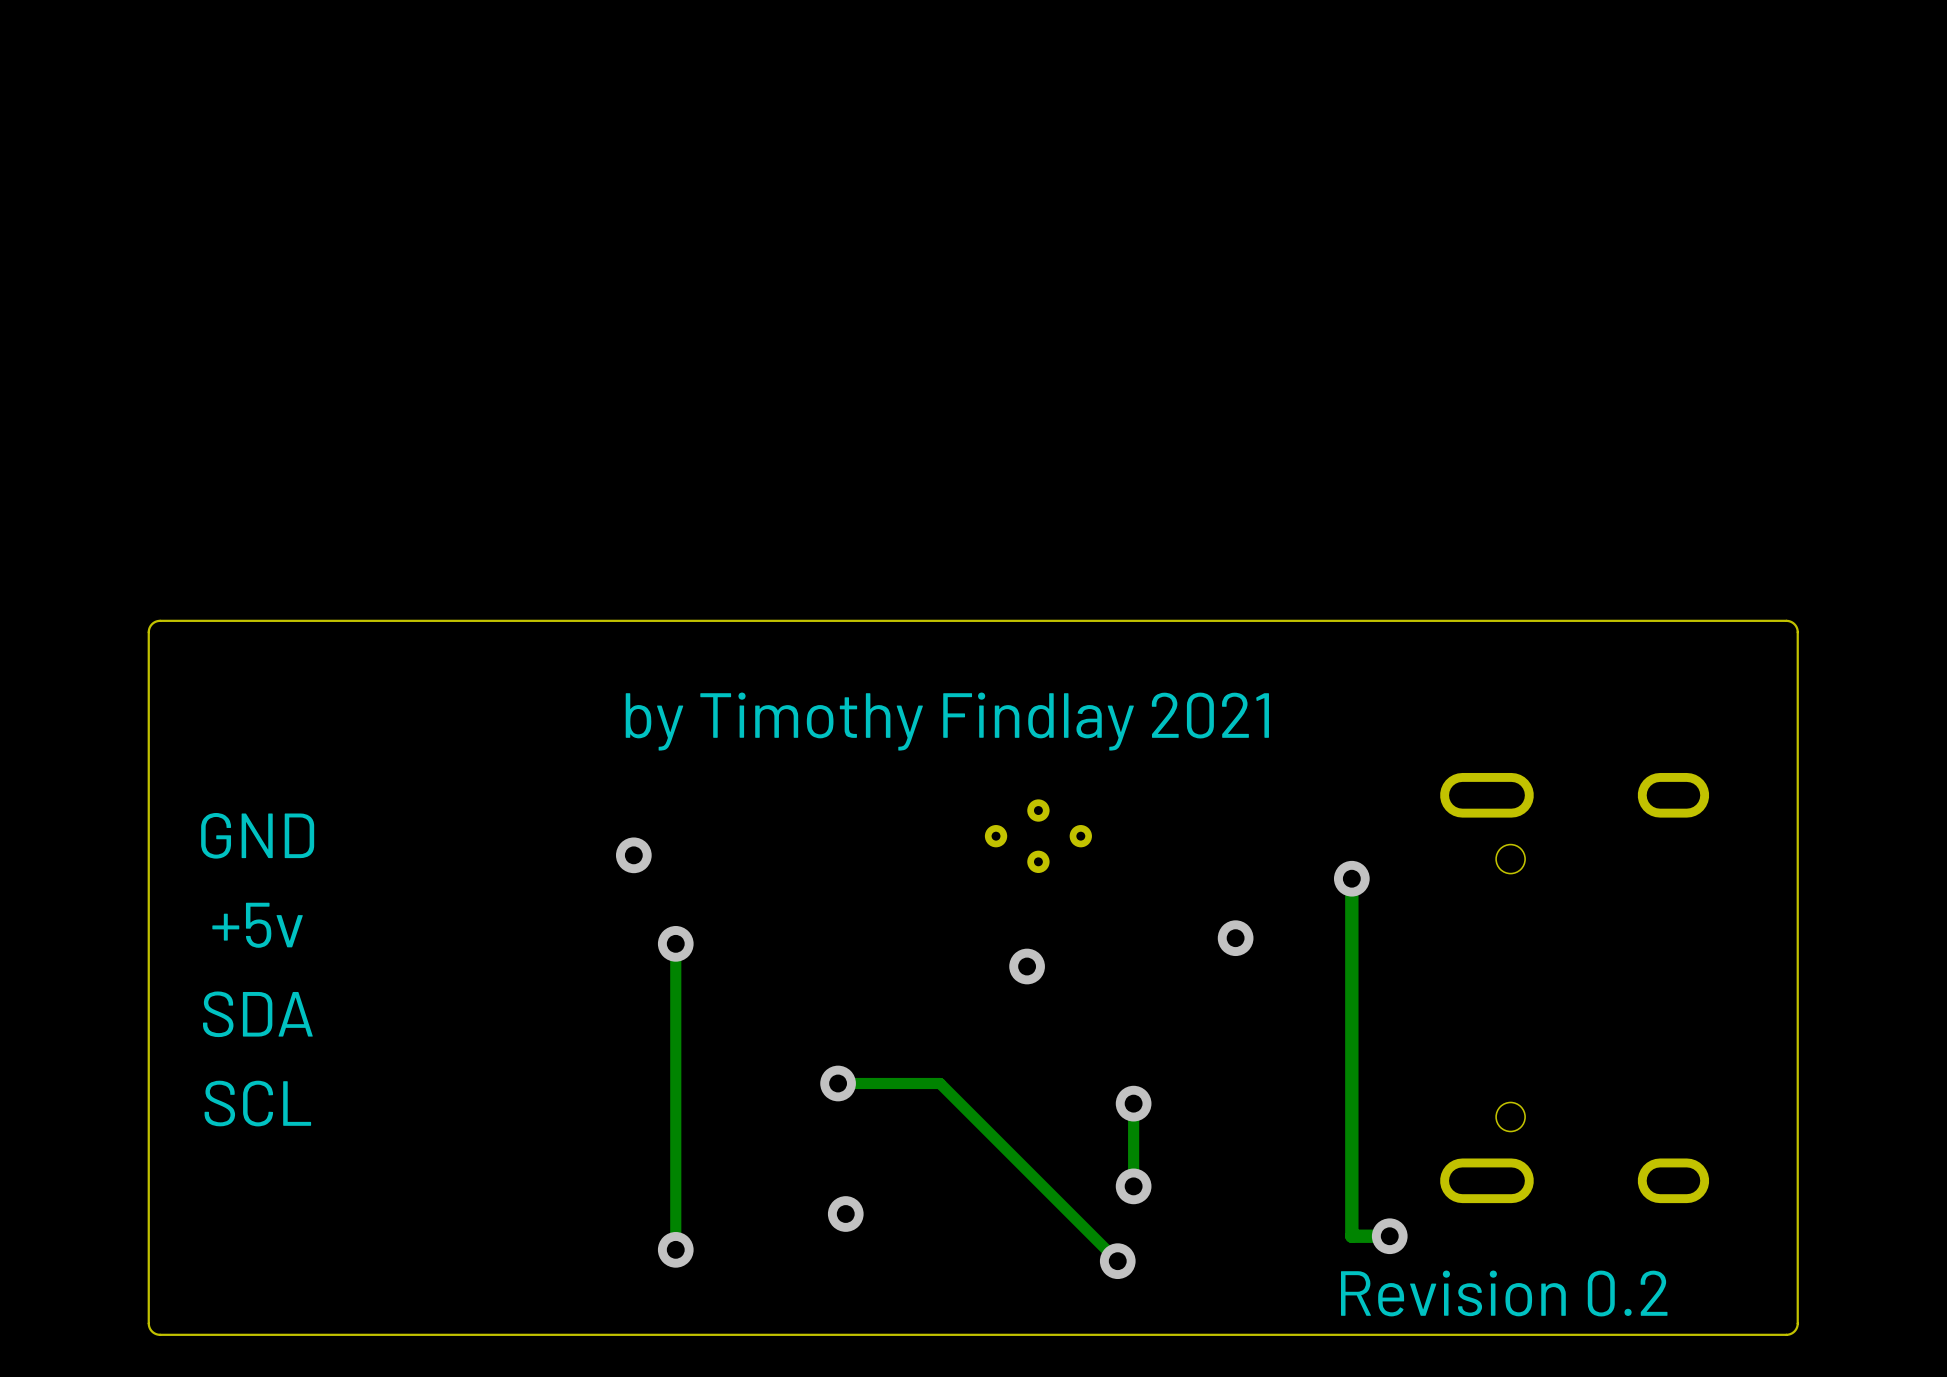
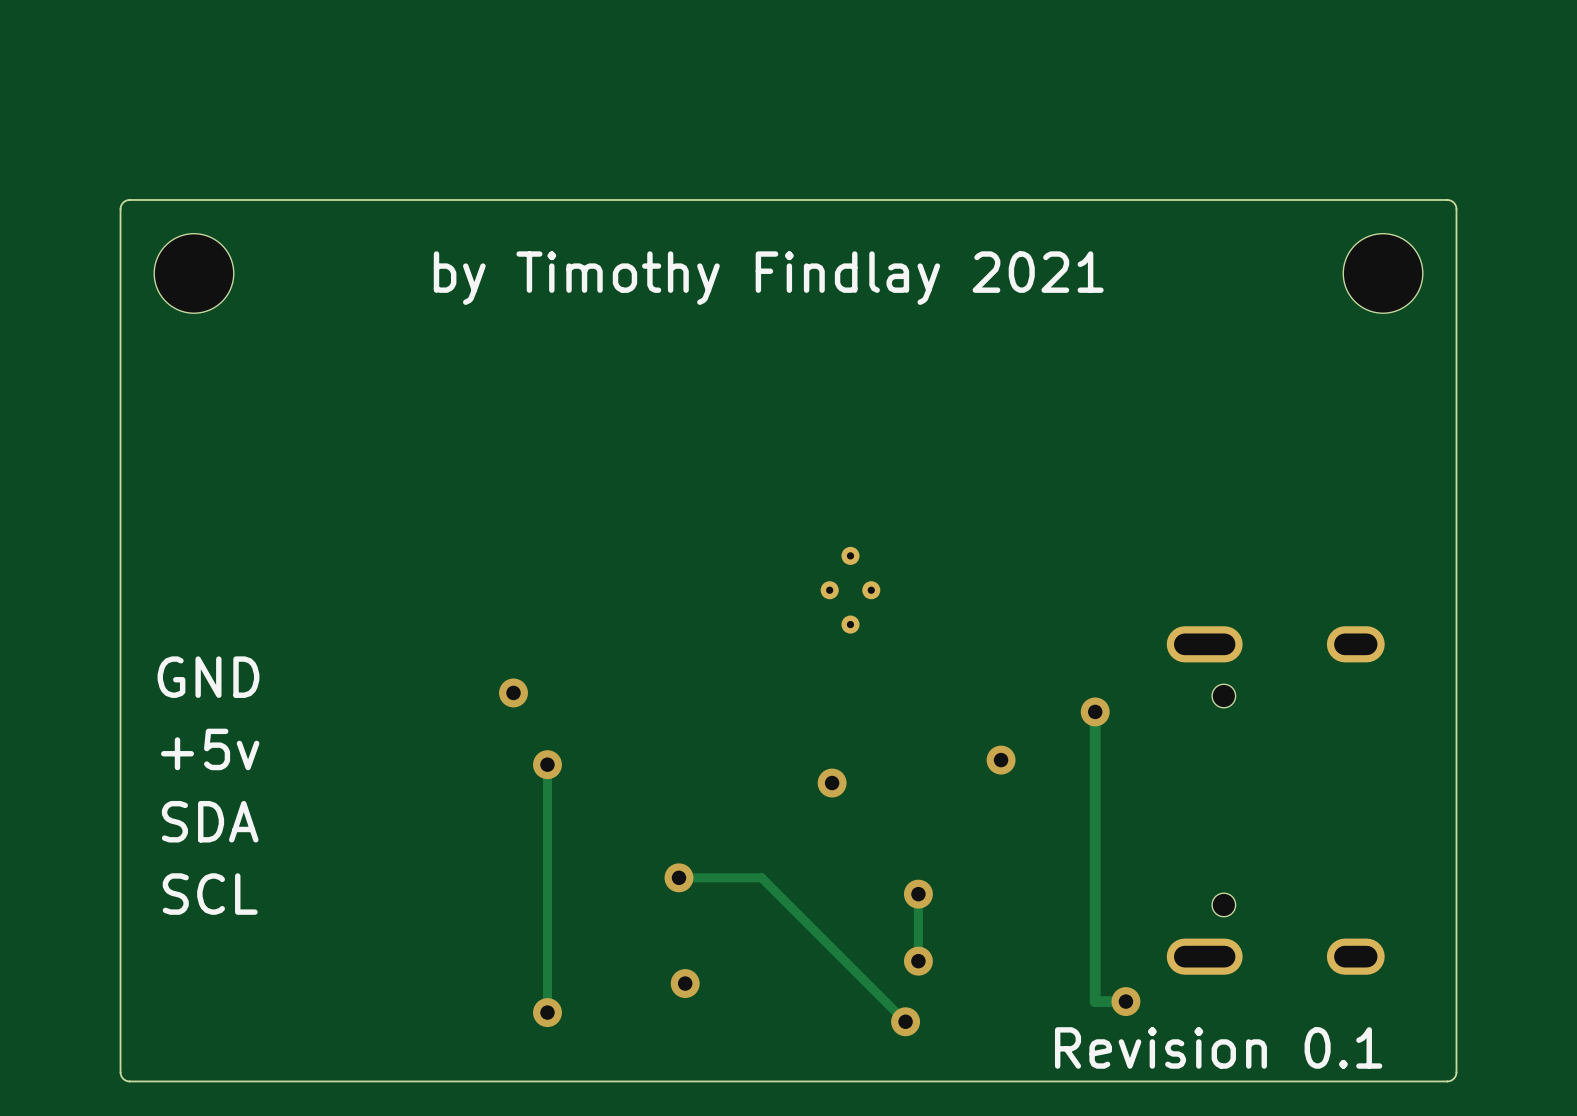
part: none -> (193, 273)
part: none -> (1383, 273)
board edge: (160, 620) (1786, 620) (1794, 624) (1797, 632) -> (120, 512) (120, 209) (123, 202) (129, 199) (1449, 200) (1454, 203) (1456, 209) (1456, 512)
board edge: (160, 620) (152, 624) (148, 632) -> none
text position: by Timothy Findlay 2021 (947, 721) -> by Timothy Findlay 2021 (768, 278)
part rotation: 0° (1038, 836) -> 90° clockwise (850, 590)
part position: (1038, 836) -> (850, 590)
text: Revision 0.2 (1504, 1293) -> Revision 0.1 (1218, 1047)

